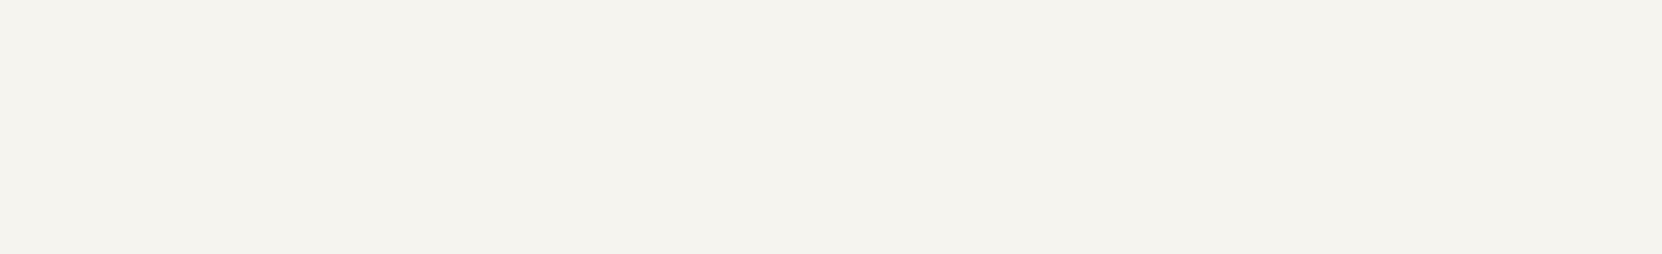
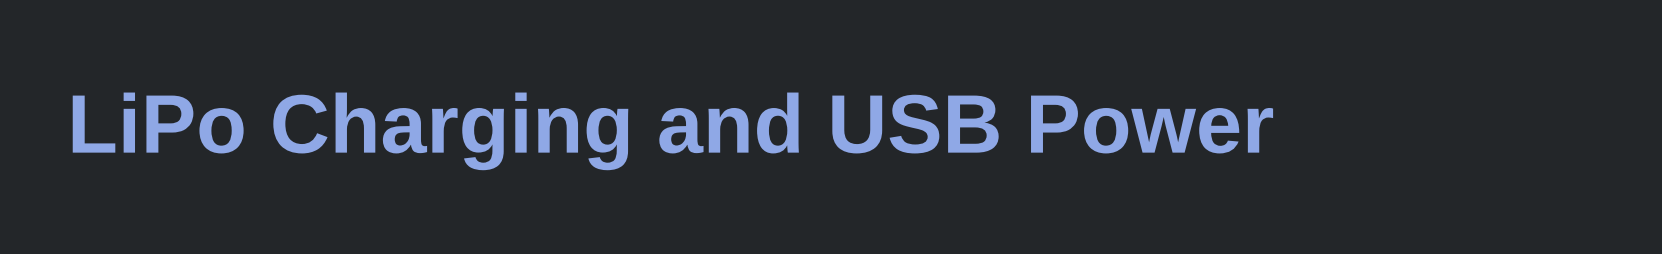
text: none -> LiPo Charging and USB Power (672, 131)

